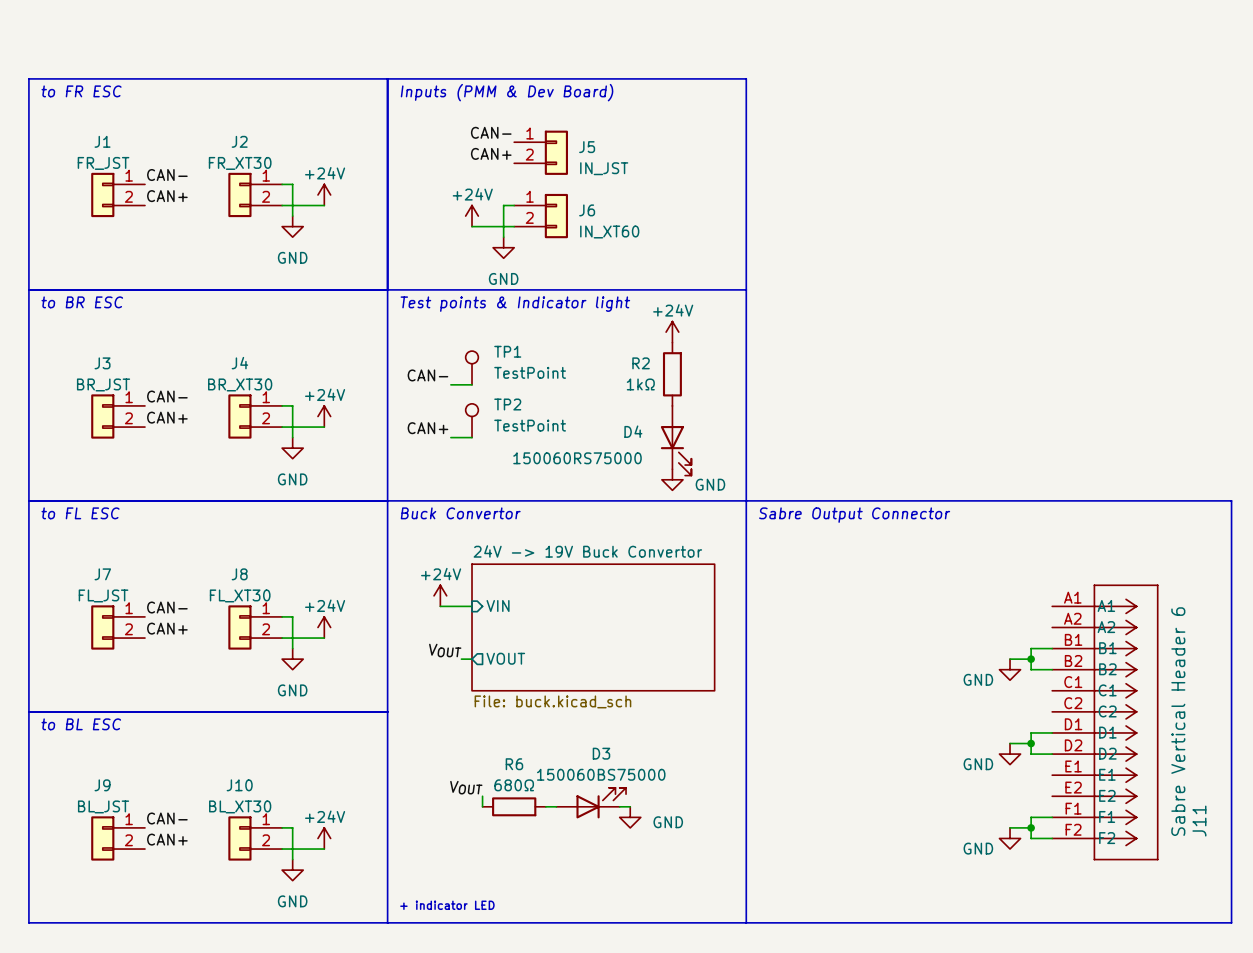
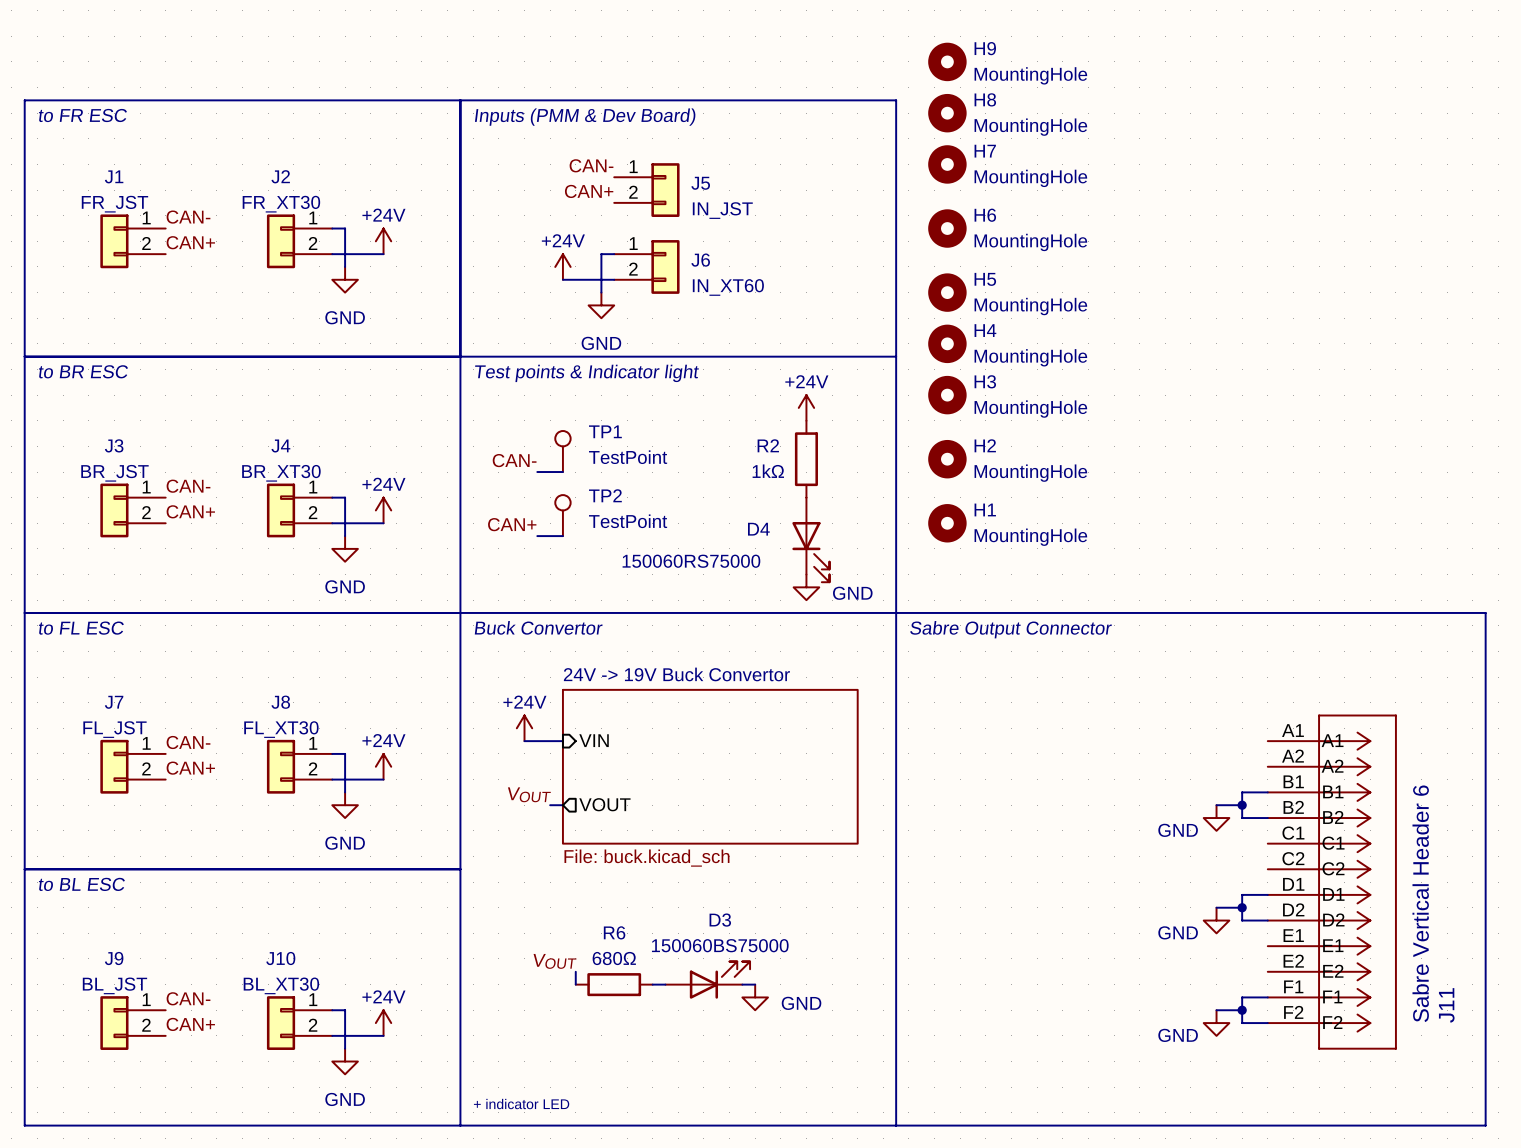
H9: none -> MountingHole (947, 61)
H8: none -> MountingHole (947, 113)
H7: none -> MountingHole (947, 164)
H6: none -> MountingHole (947, 228)
H5: none -> MountingHole (947, 292)
H4: none -> MountingHole (947, 343)
H3: none -> MountingHole (947, 395)
H2: none -> MountingHole (947, 459)
H1: none -> MountingHole (947, 523)

